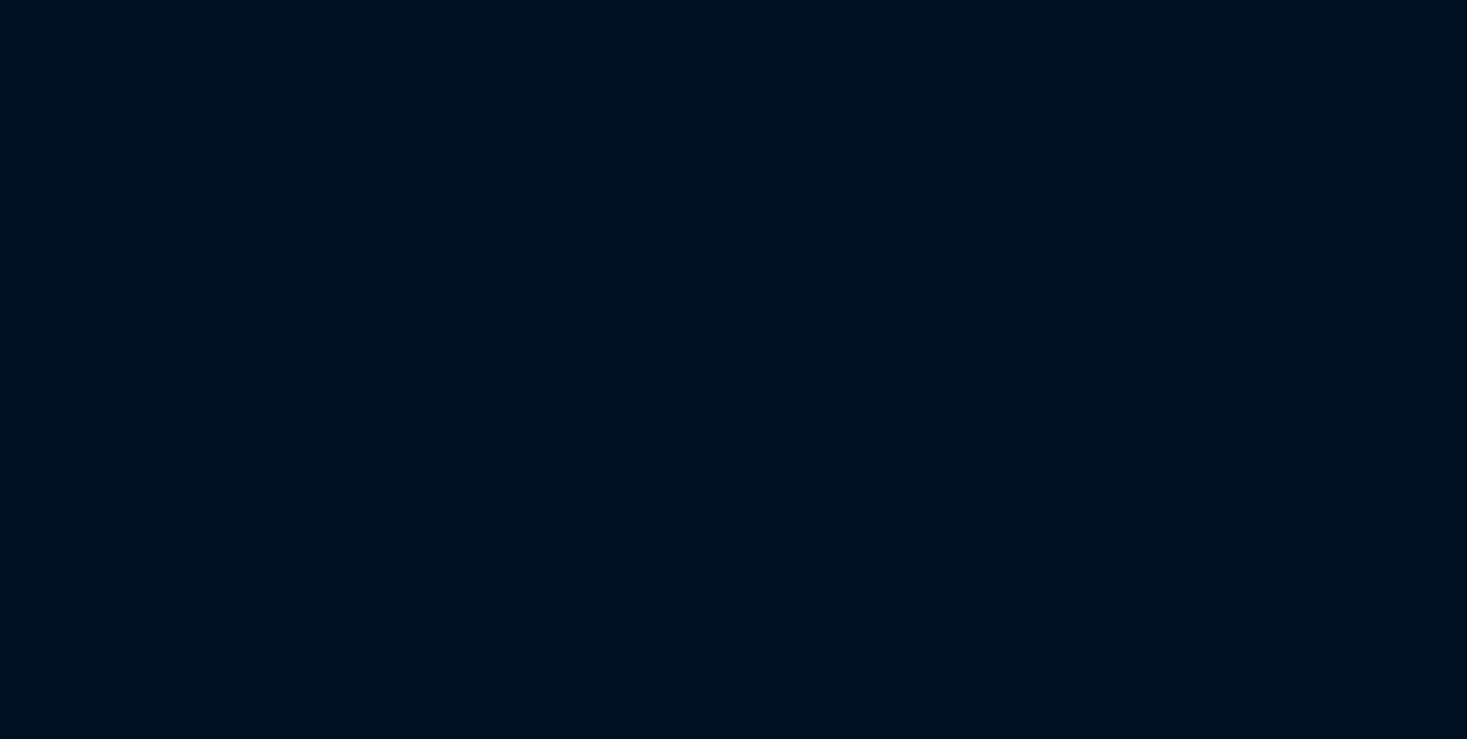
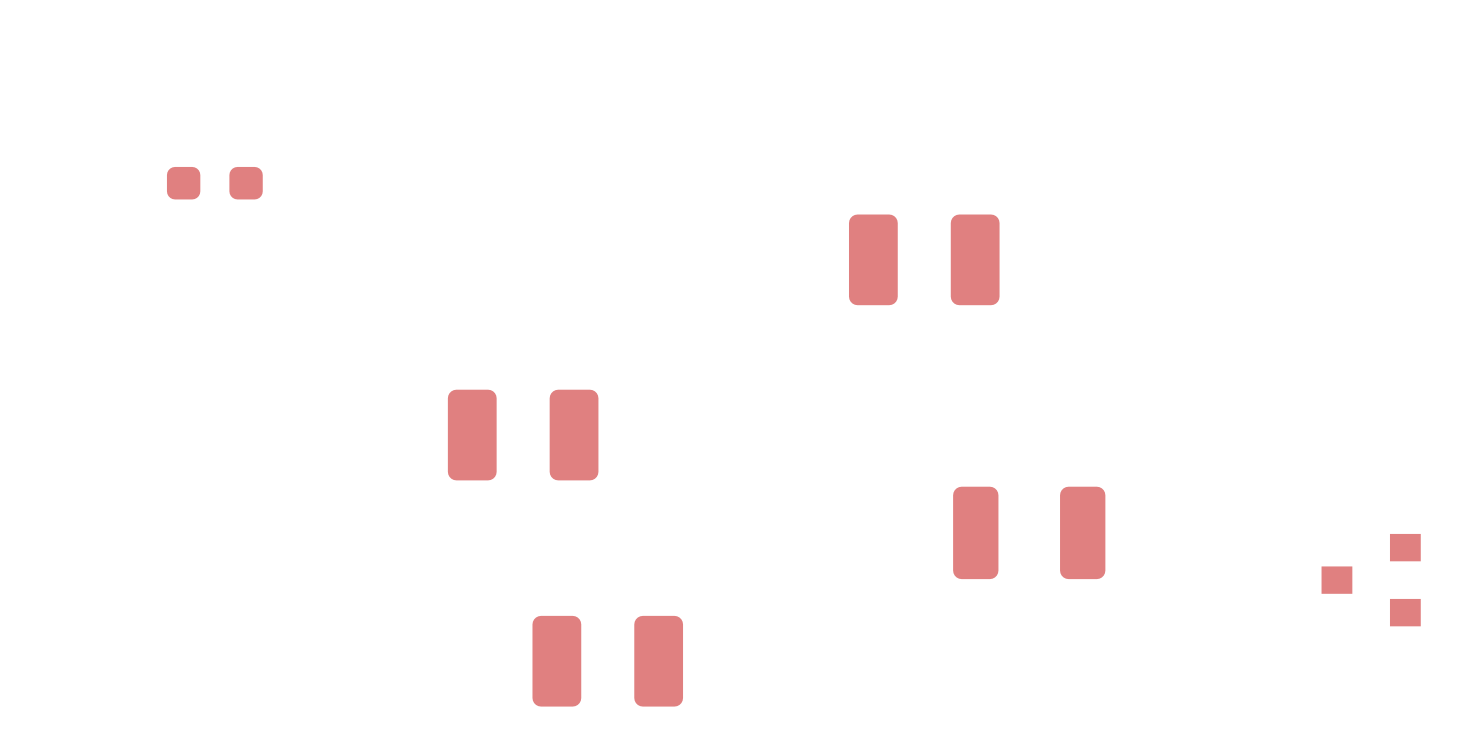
part: none -> (214, 183)
part: none -> (924, 259)
part: none -> (523, 435)
part: none -> (1029, 532)
part: none -> (1371, 580)
part: none -> (607, 661)

